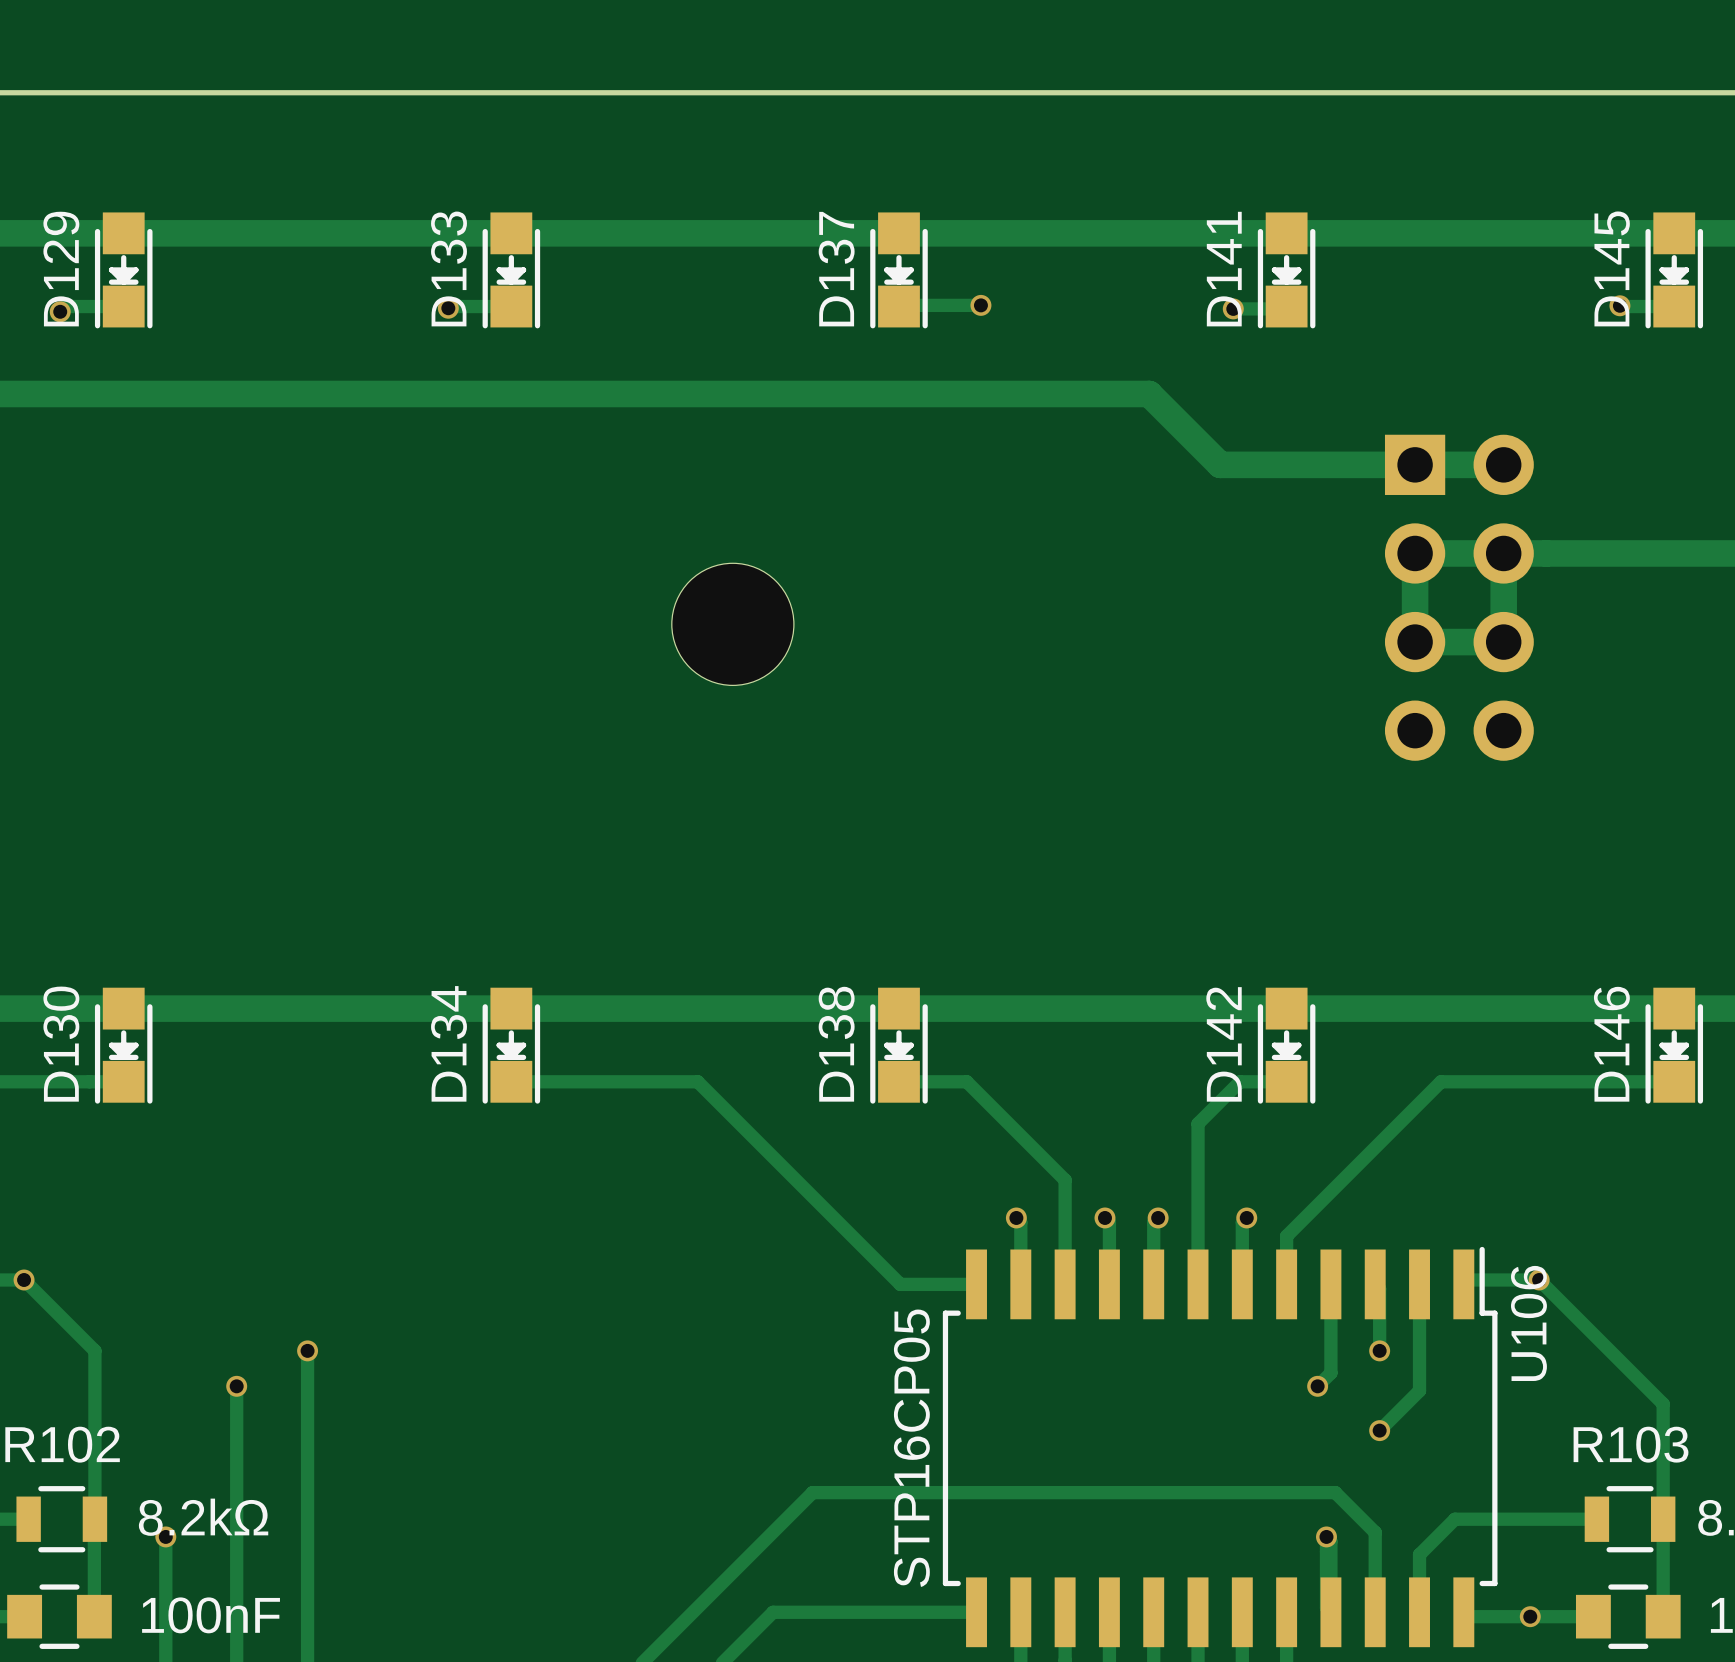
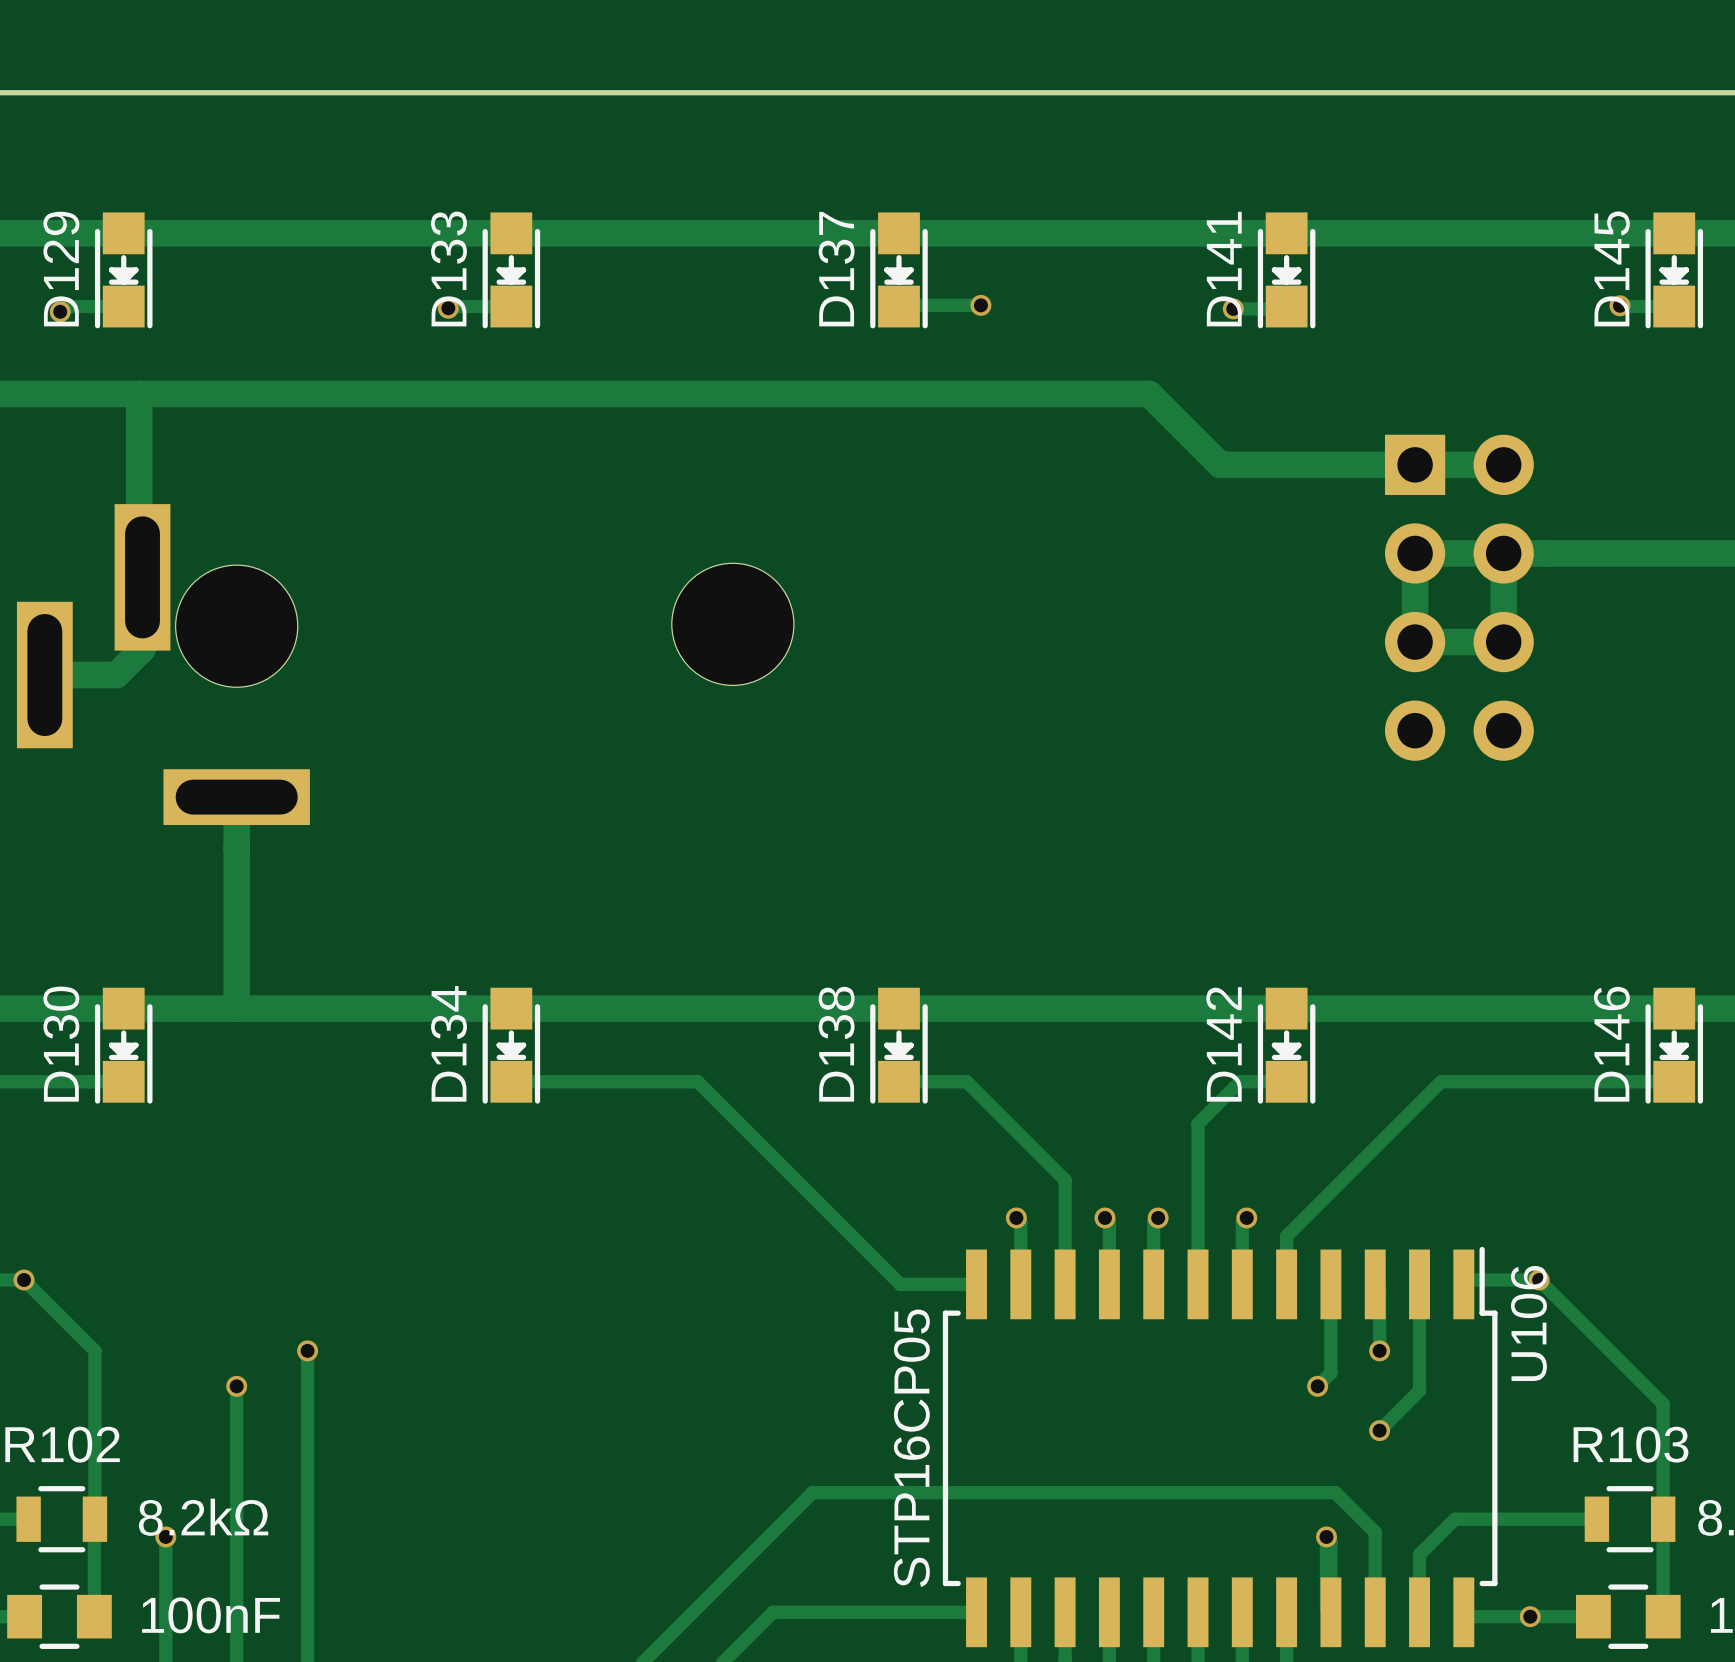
track: none -> (139, 393) (139, 574) (142, 577) (142, 649) (116, 675) (44, 675)
part: none -> (163, 664)
track: none -> (236, 797) (236, 1008)

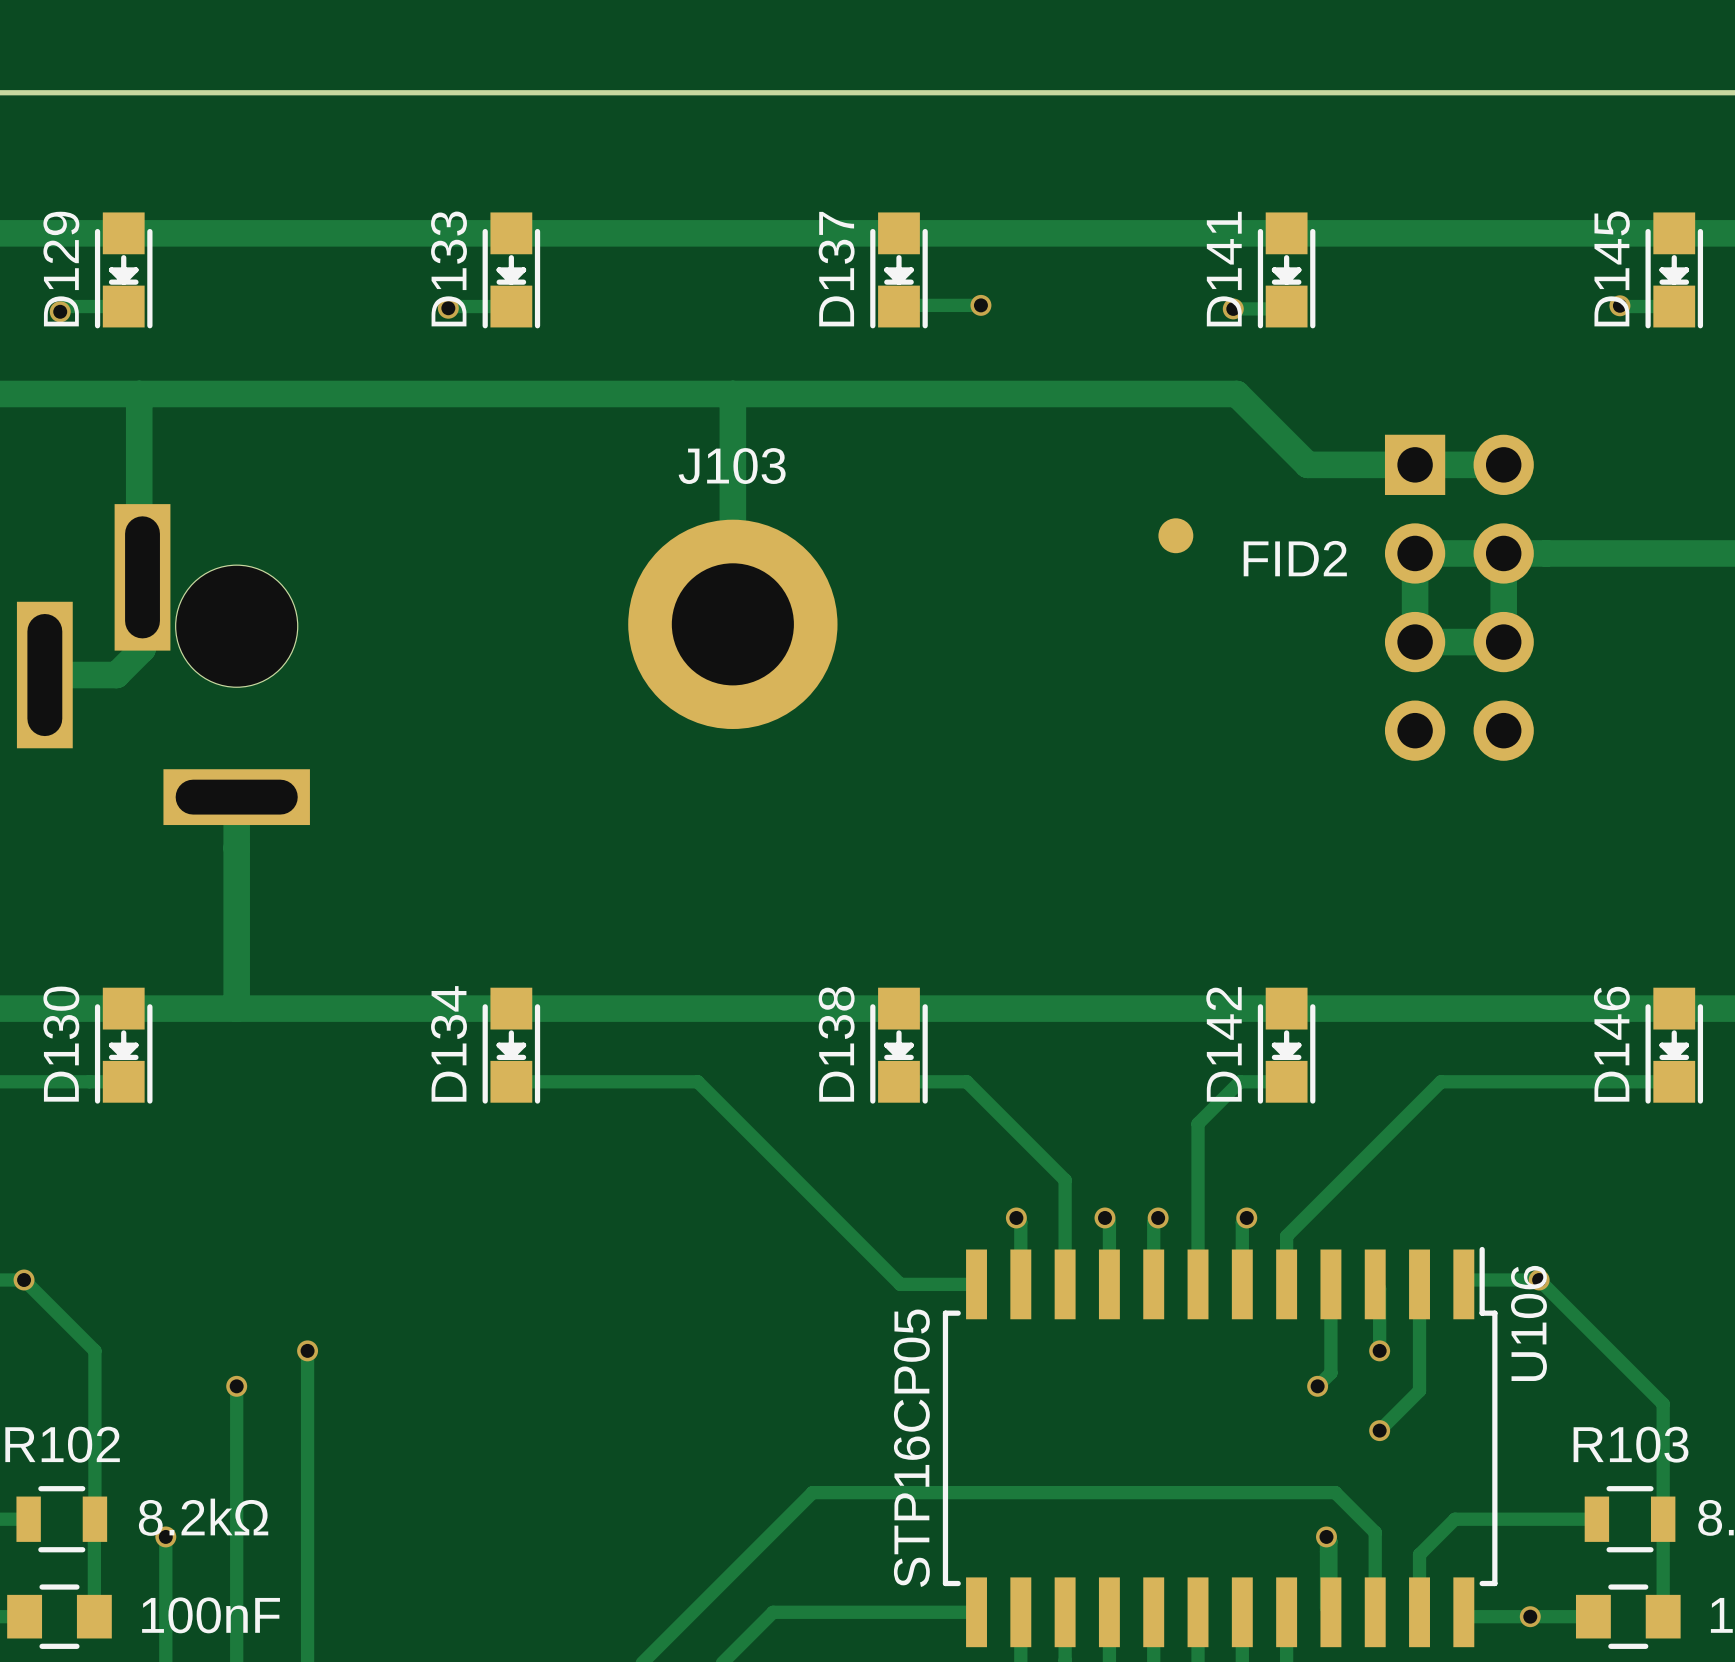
track: none -> (732, 393) (732, 624)
track: (1149, 393) (1220, 464) (1307, 464) -> (1149, 393) (1236, 393) (1307, 464)
FID2: none -> (1175, 535)
part: (732, 624) -> none
J103: none -> (732, 624)

